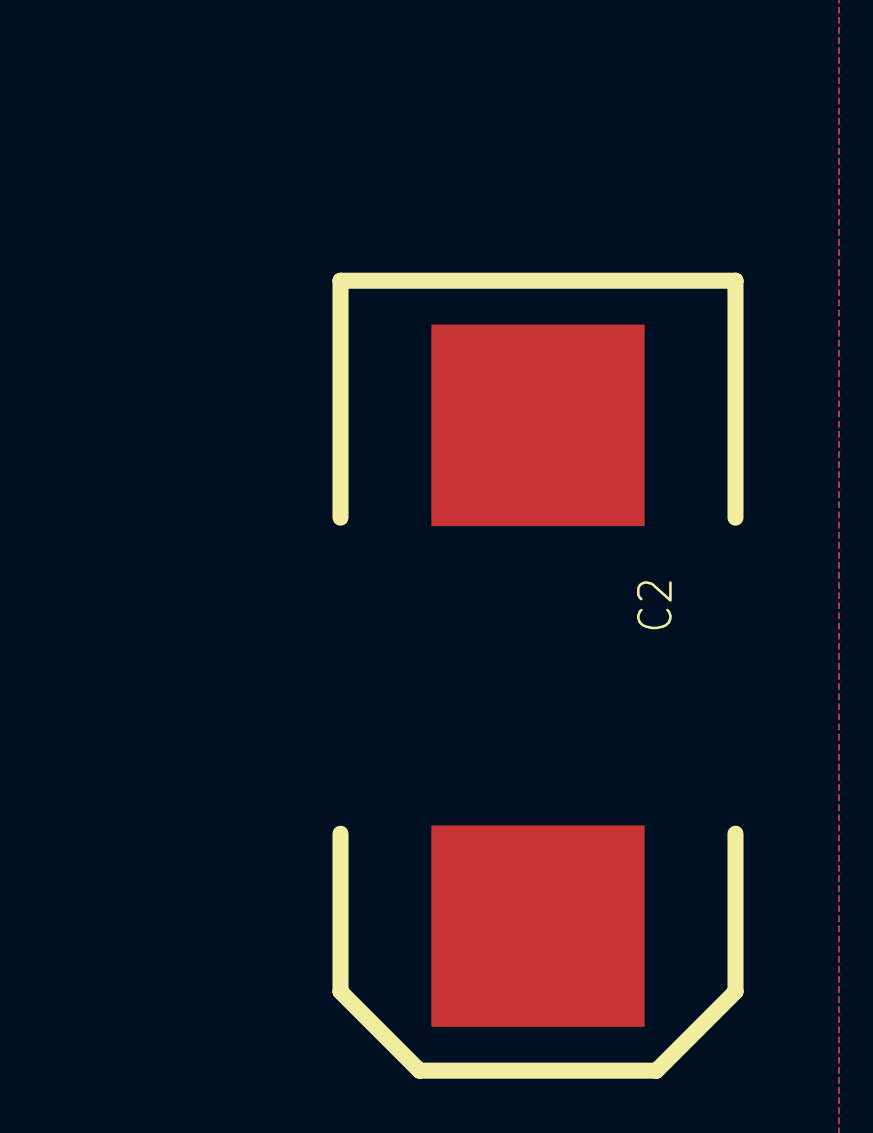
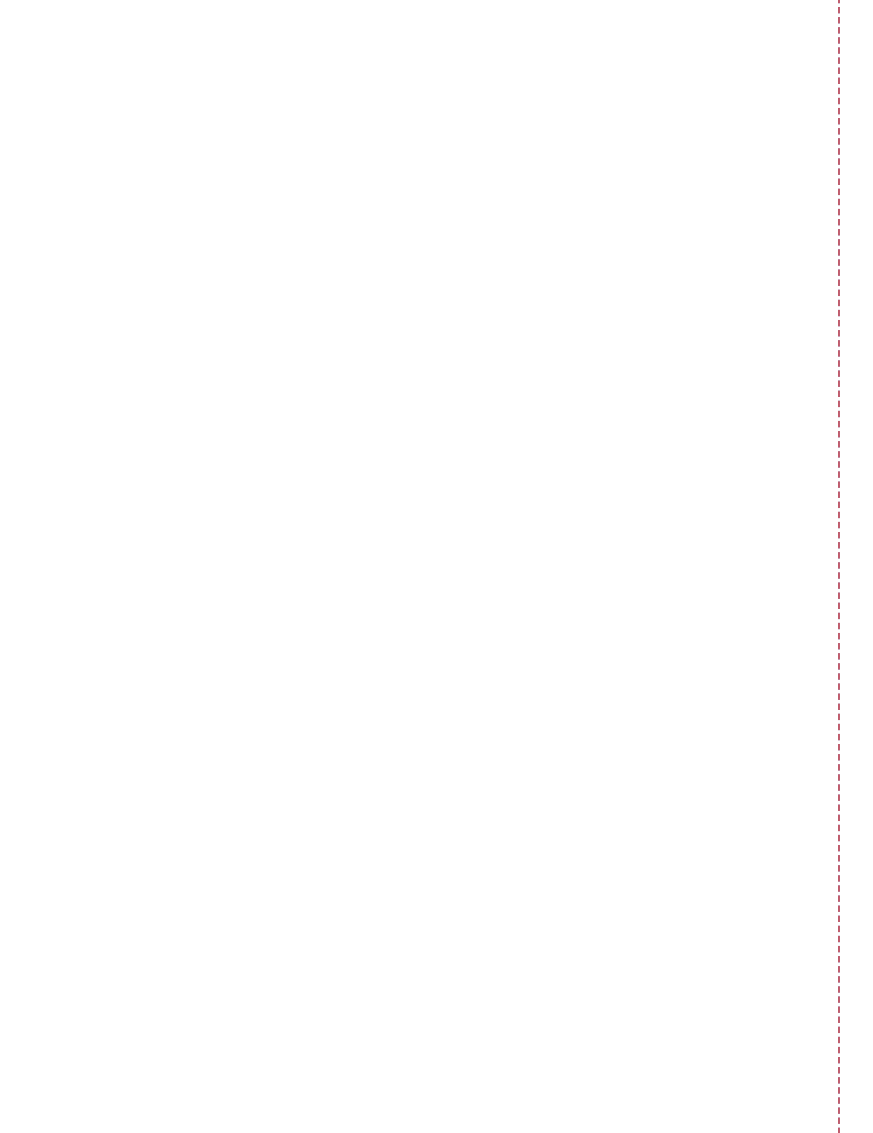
C2: (538, 675) -> none

